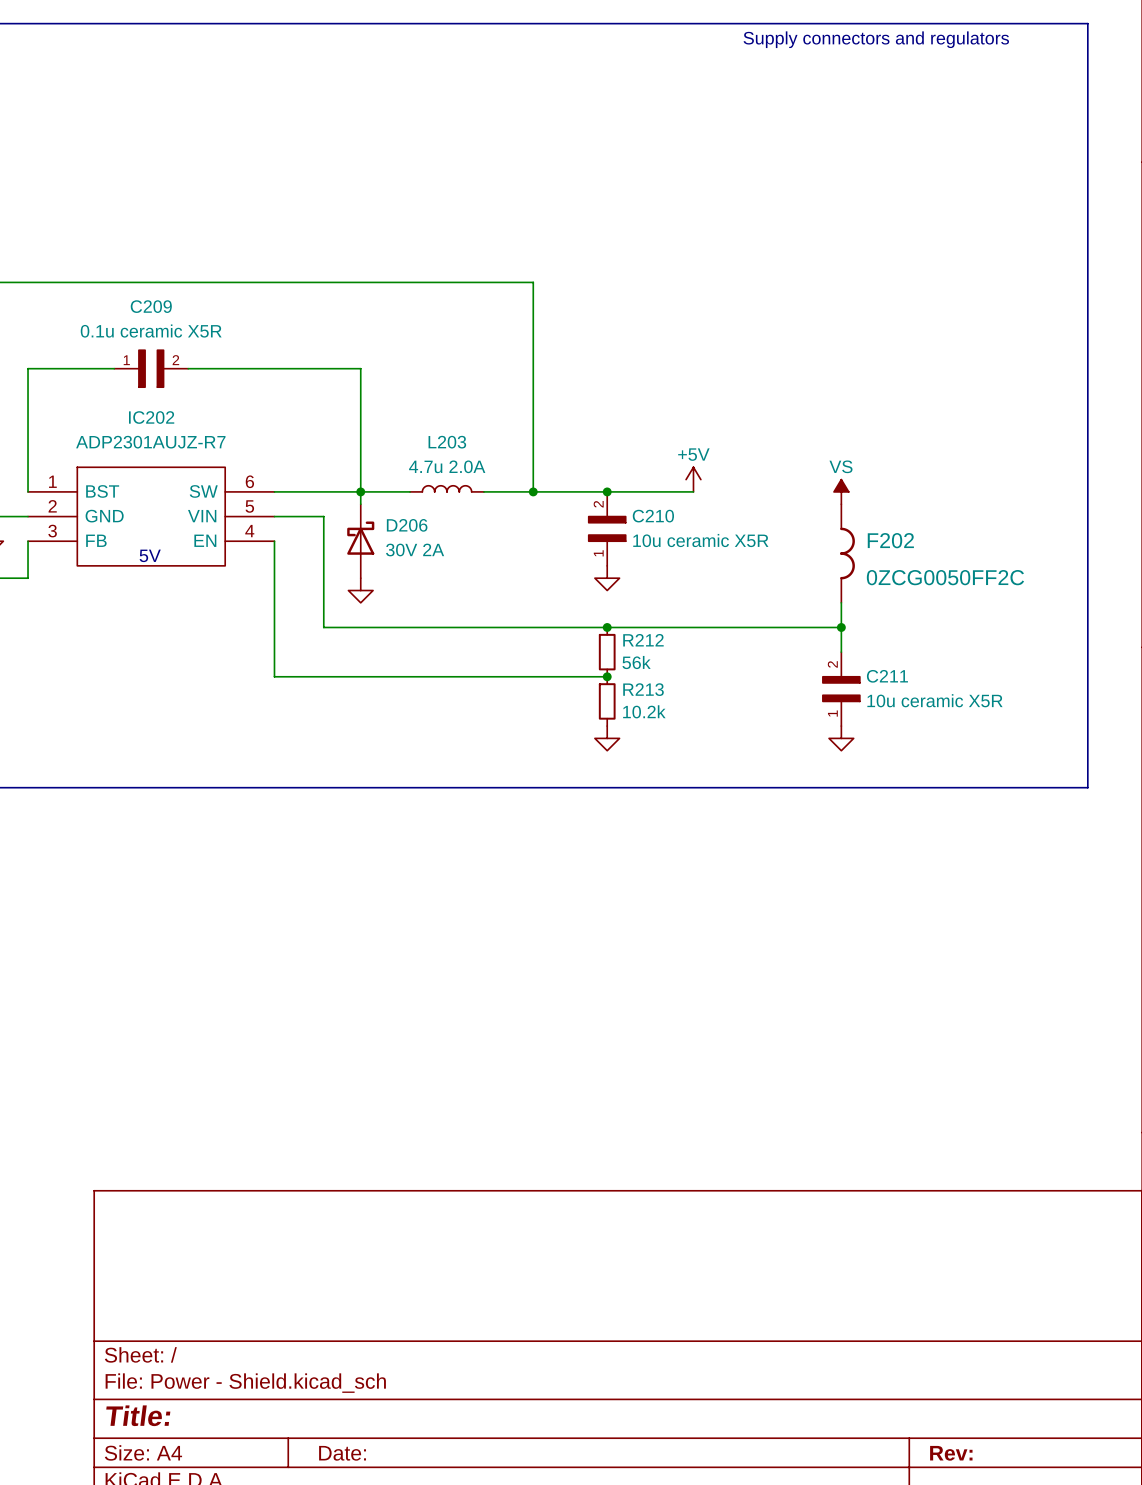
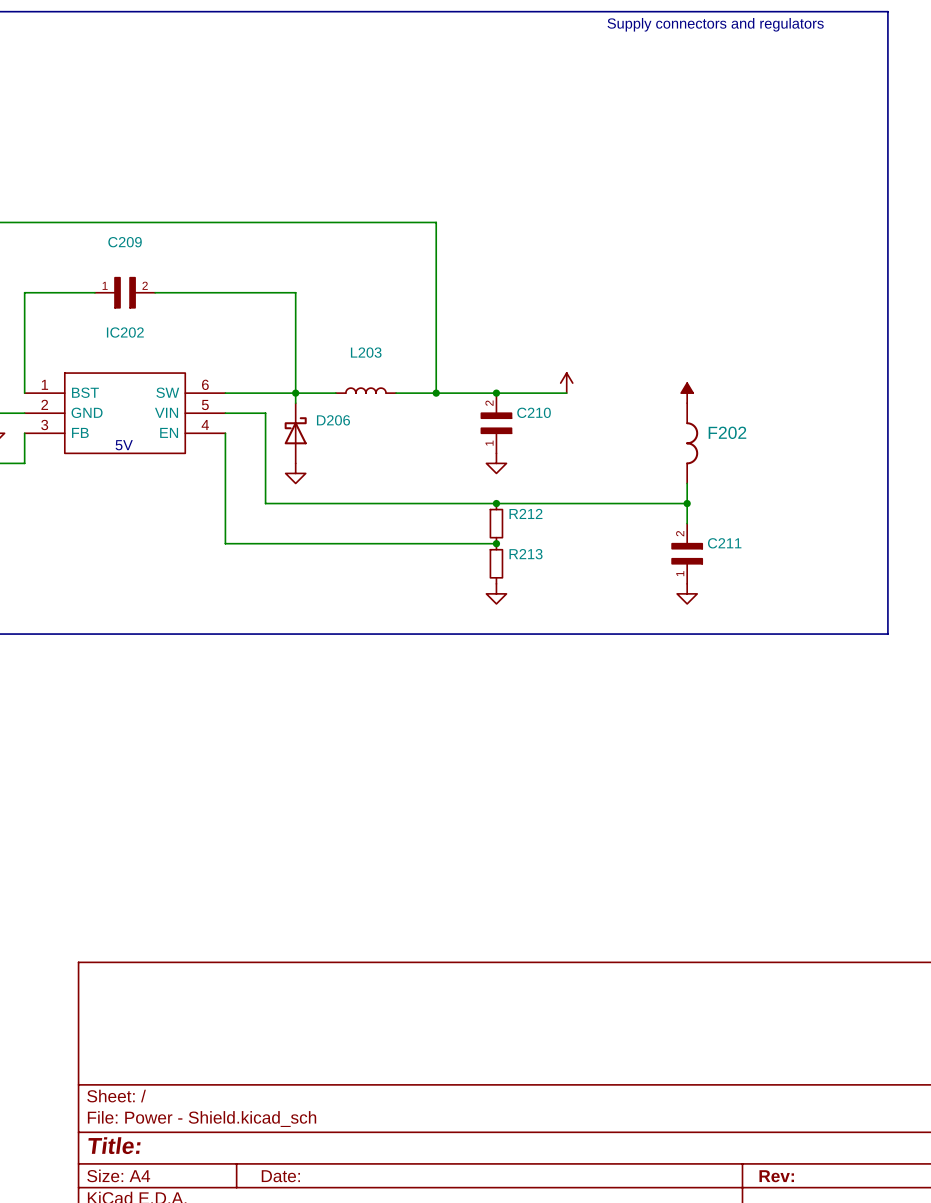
C209 value: 0.1u ceramic X5R (151, 331) -> none
IC202 value: ADP2301AUJZ-R7 (150, 442) -> none
power symbol text: +5V (693, 454) -> none
L203 value: 4.7u 2.0A (447, 466) -> none
power symbol text: VS (840, 466) -> none
C210 value: 10u ceramic X5R (700, 540) -> none
D206 value: 30V 2A (415, 550) -> none
F202 value: 0ZCG0050FF2C (945, 577) -> none
R212 value: 56k (636, 662) -> none
C211 value: 10u ceramic X5R (934, 700) -> none
R213 value: 10.2k (644, 711) -> none

